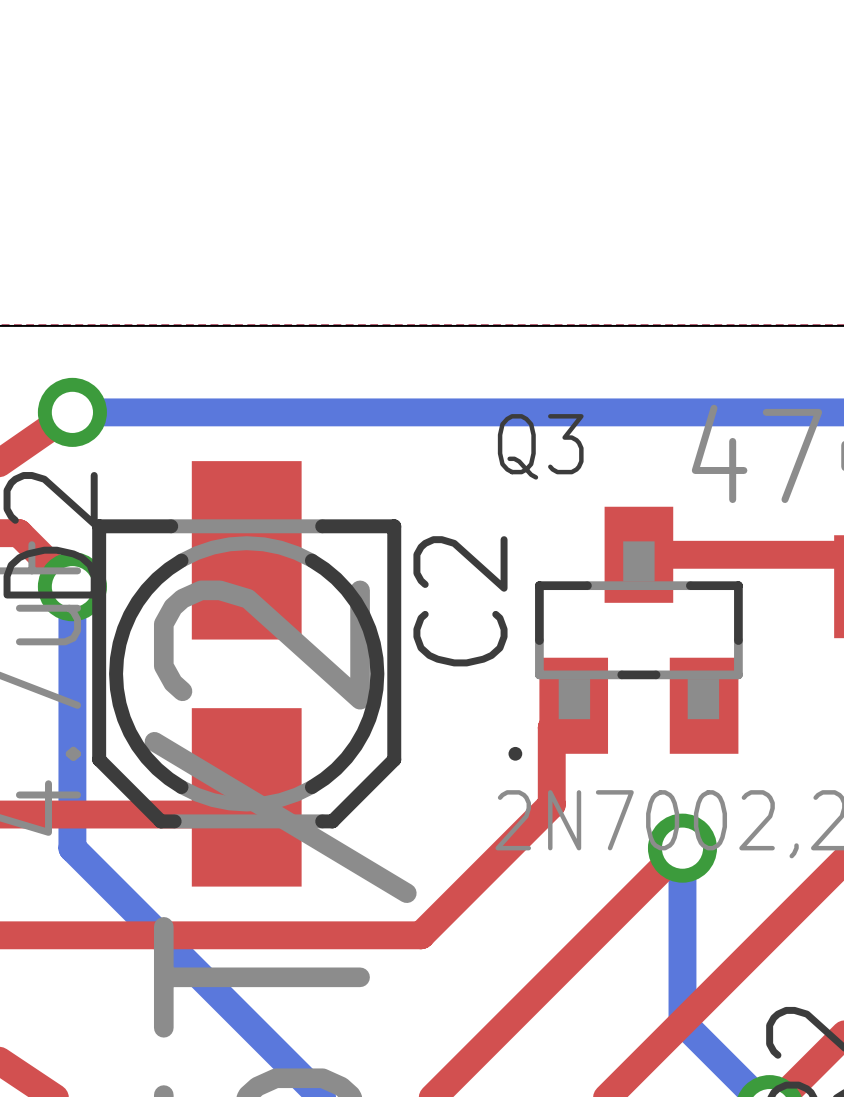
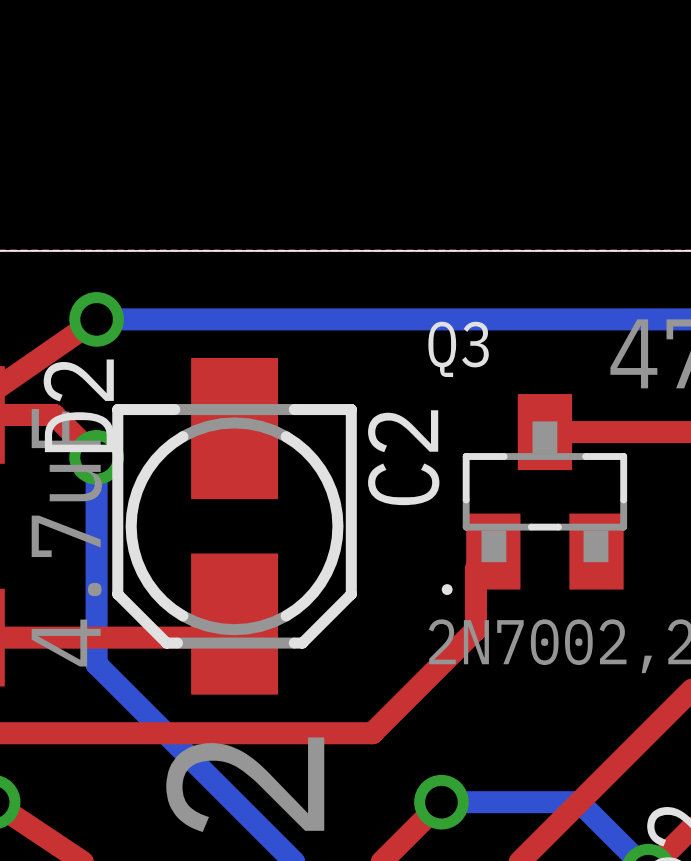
top track: (682, 848) (508, 1022) -> none
bottom track: (682, 848) (682, 1022) -> (441, 802) (579, 802)
via position: (682, 848) -> (441, 802)

